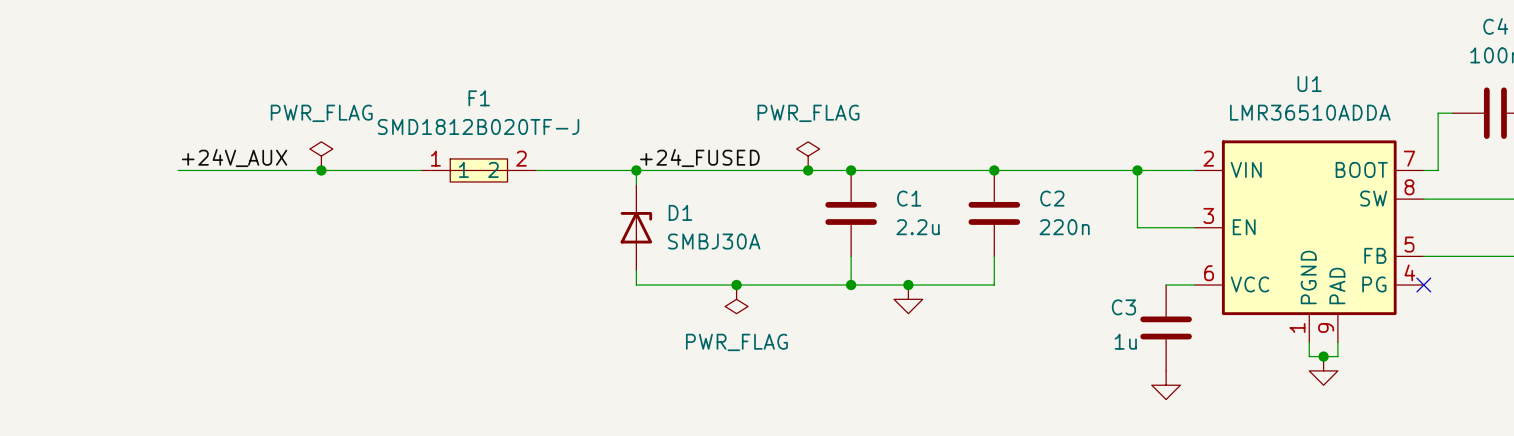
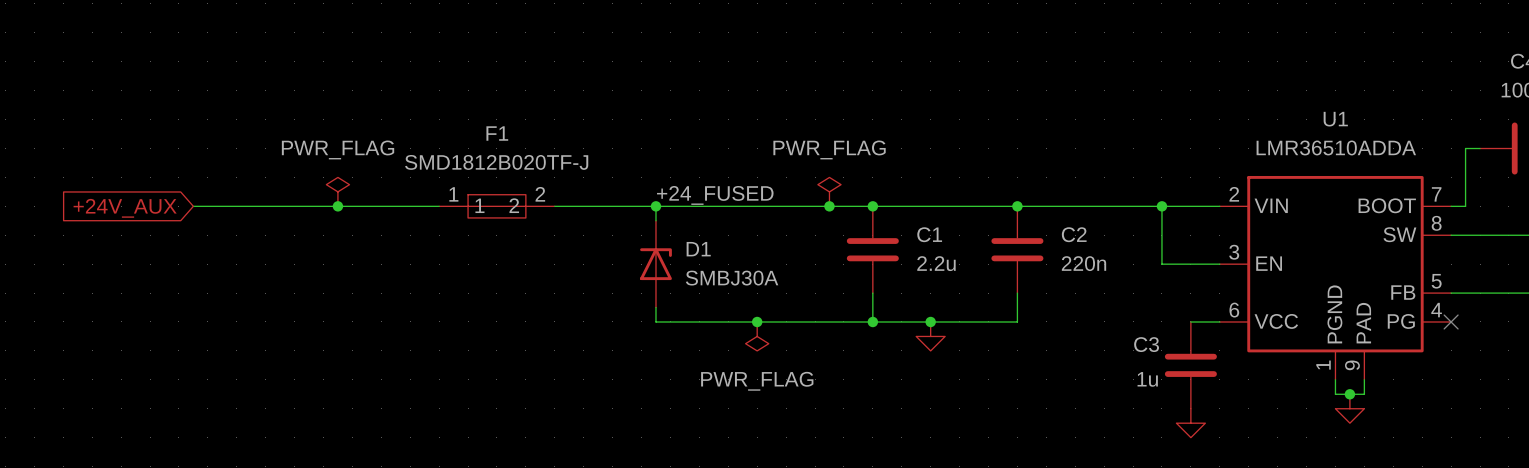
label: +24V_AUX (234, 158) -> none
global label: none -> +24V_AUX (125, 208)

